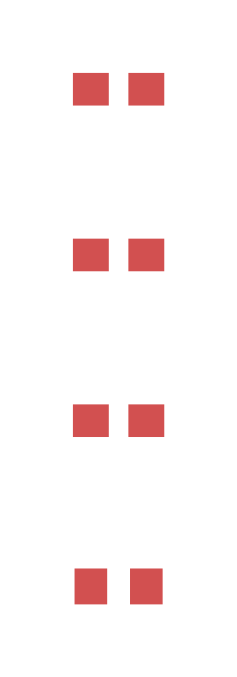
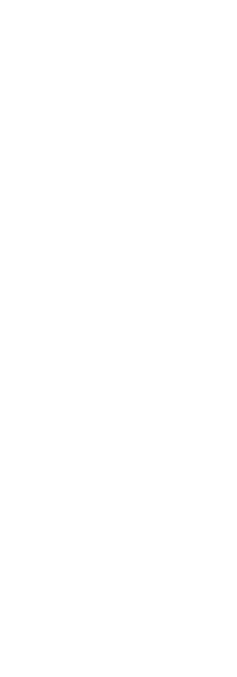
part: (118, 89) -> none
part: (118, 254) -> none
part: (118, 420) -> none
part: (118, 586) -> none

